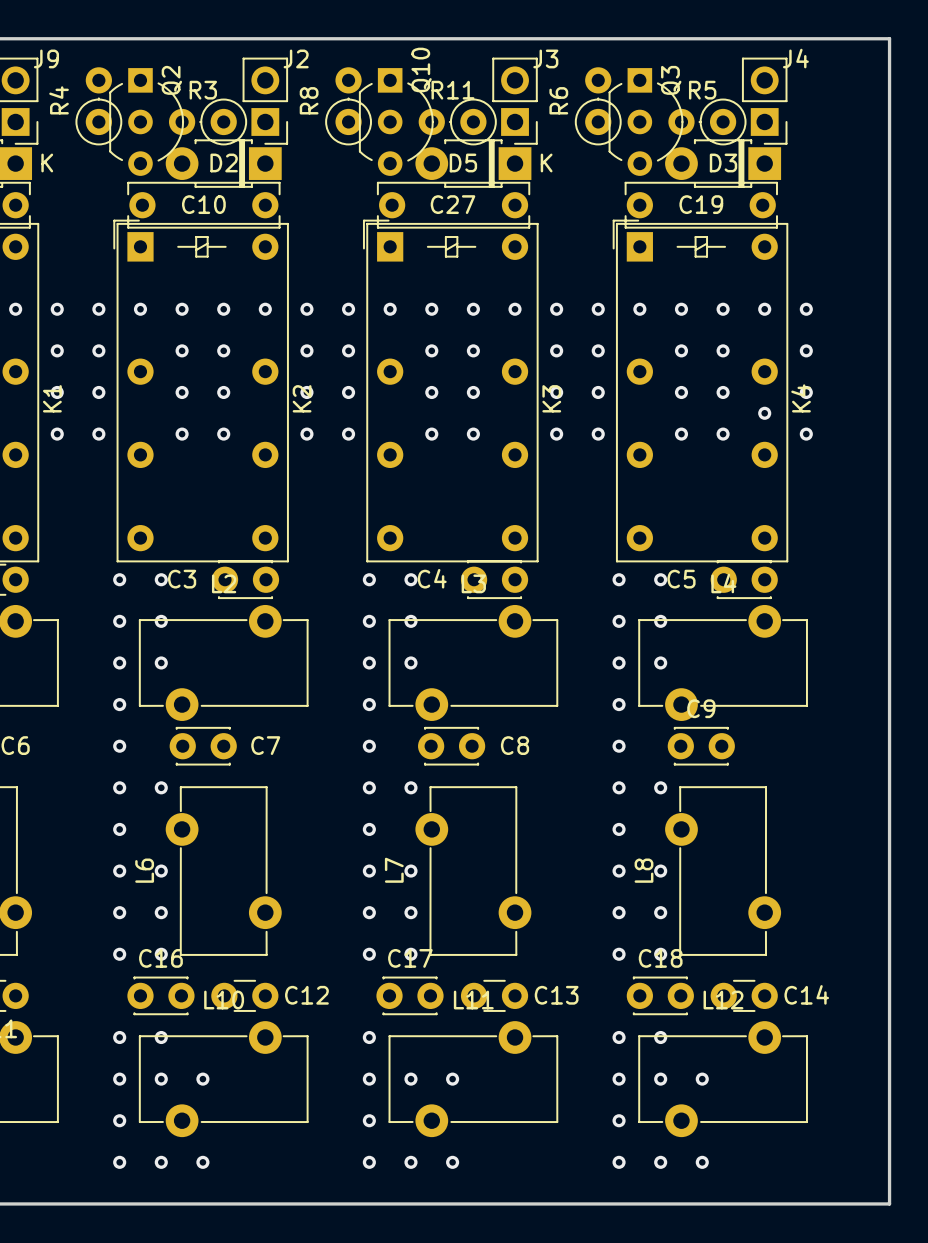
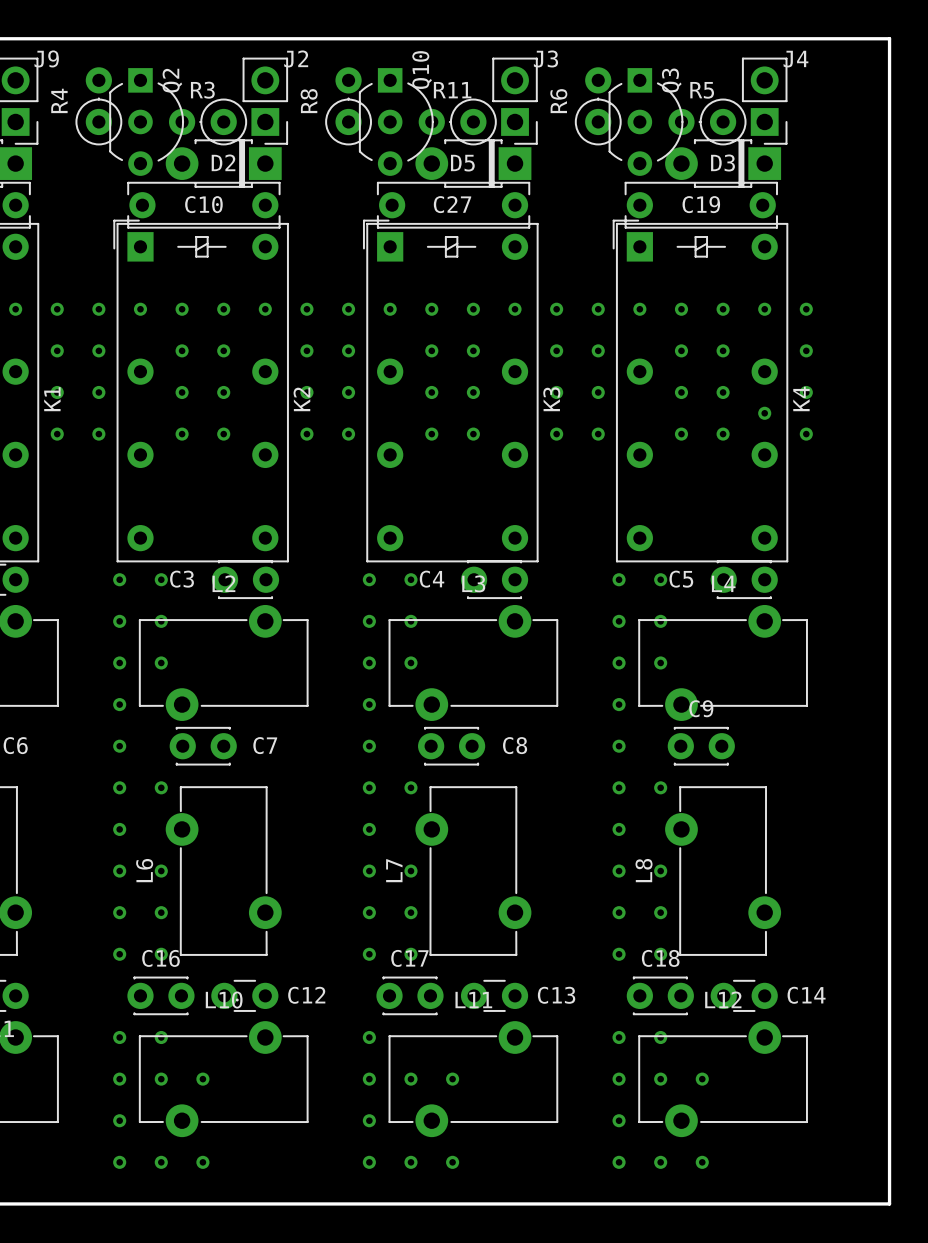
part text: K (47, 162) -> none
D5 text: K (546, 162) -> none

